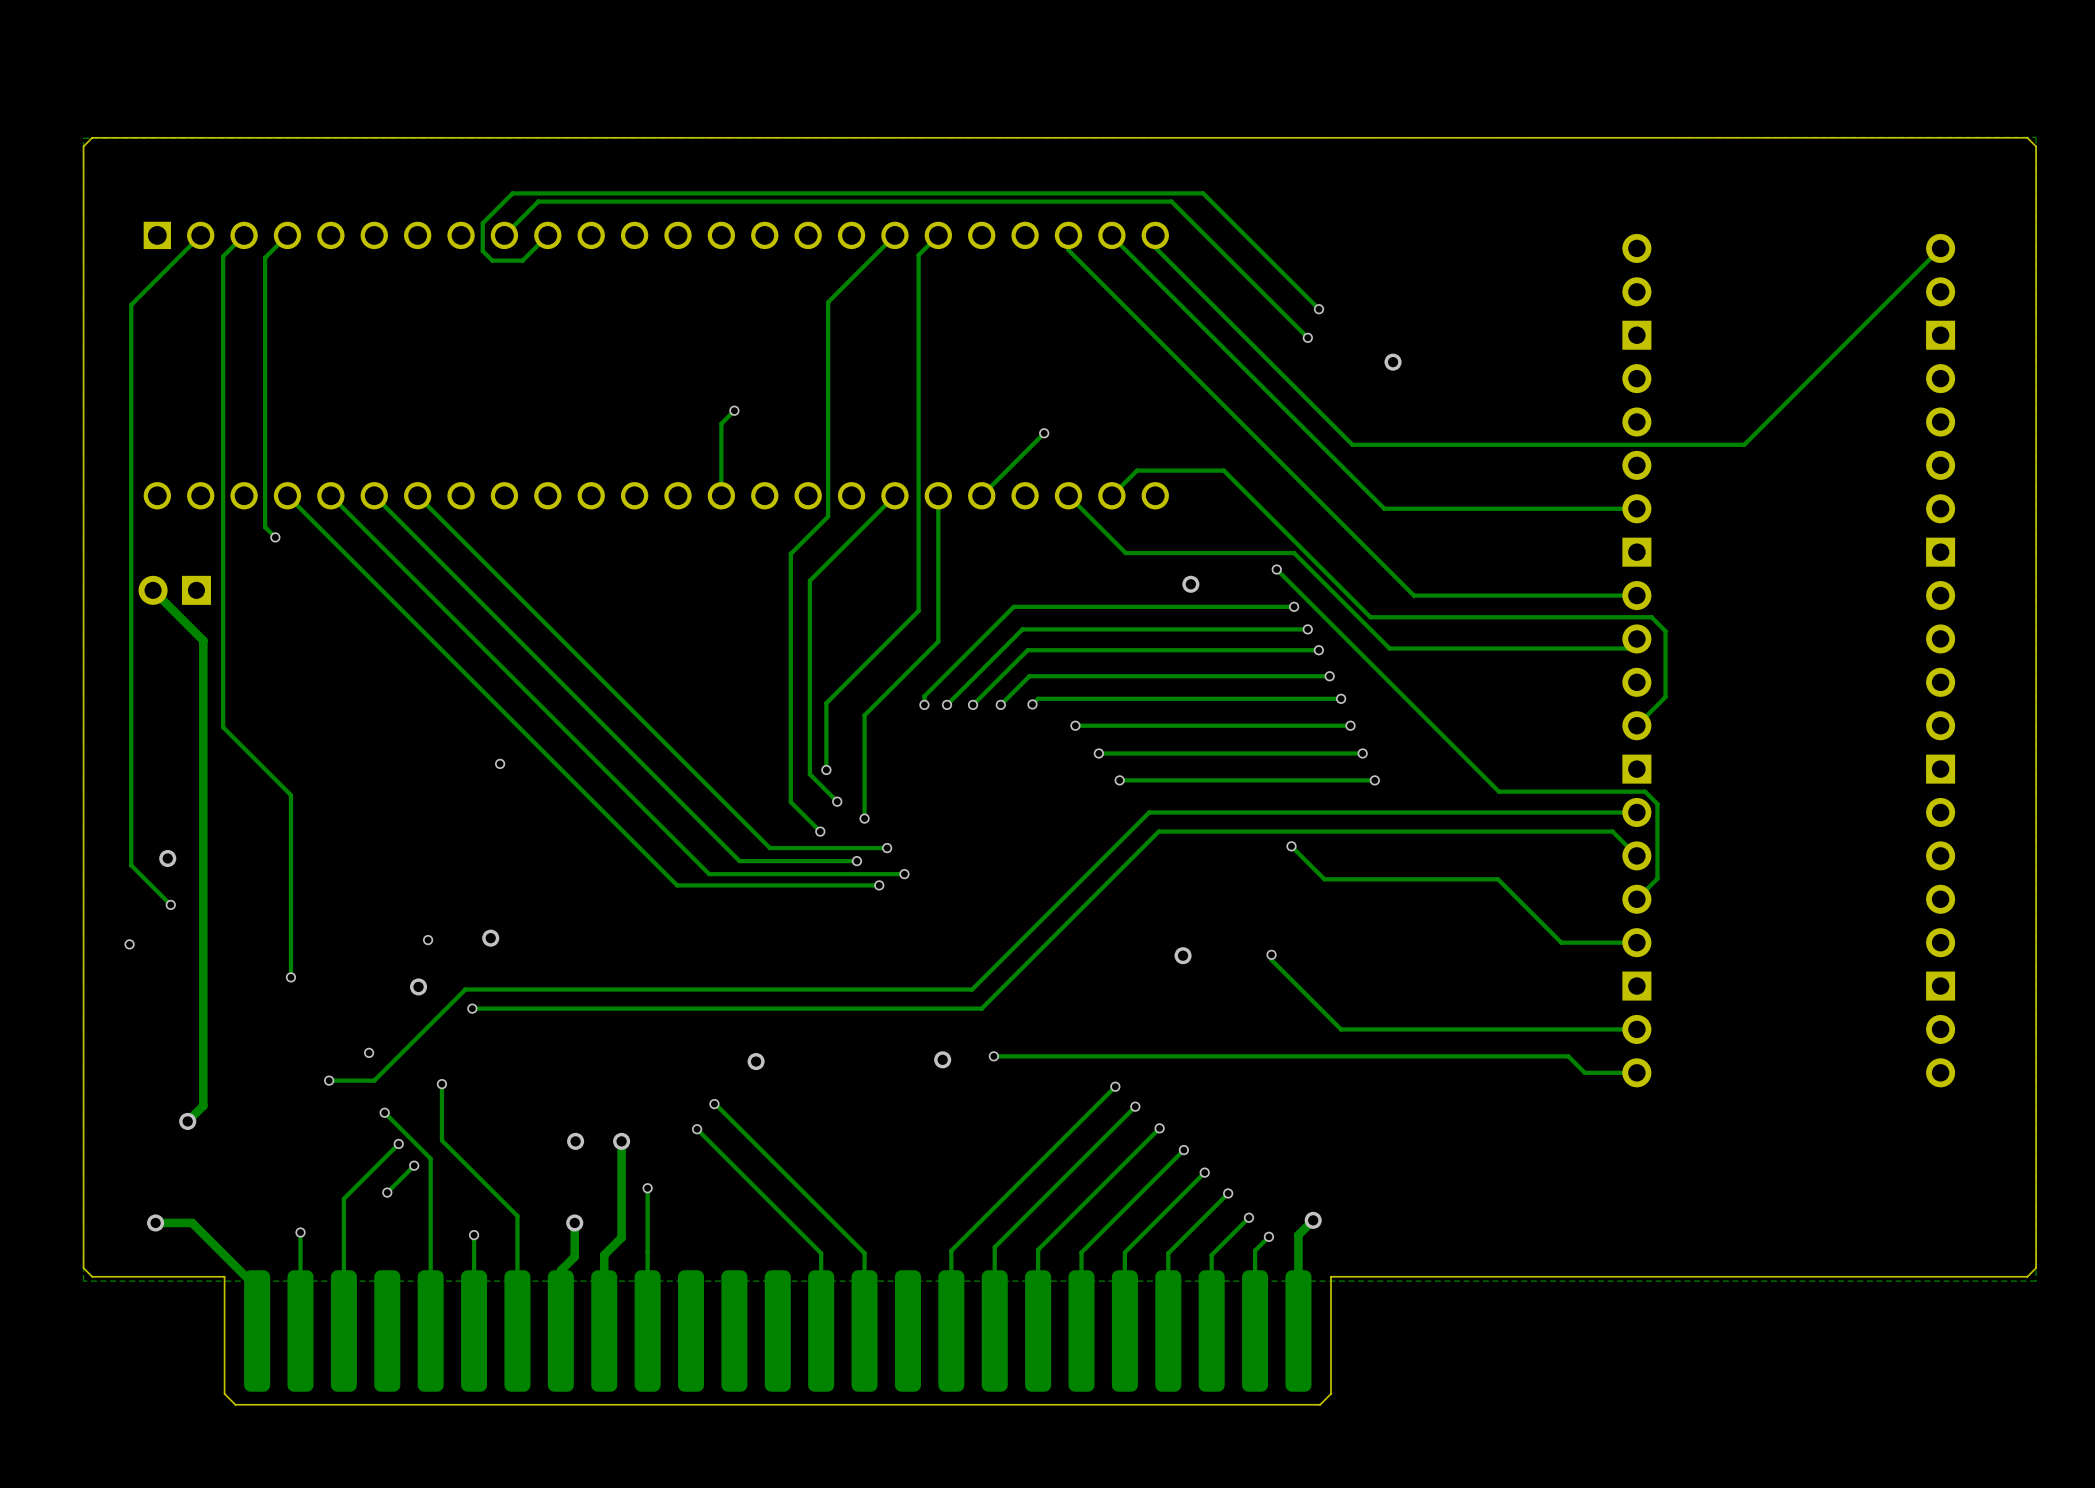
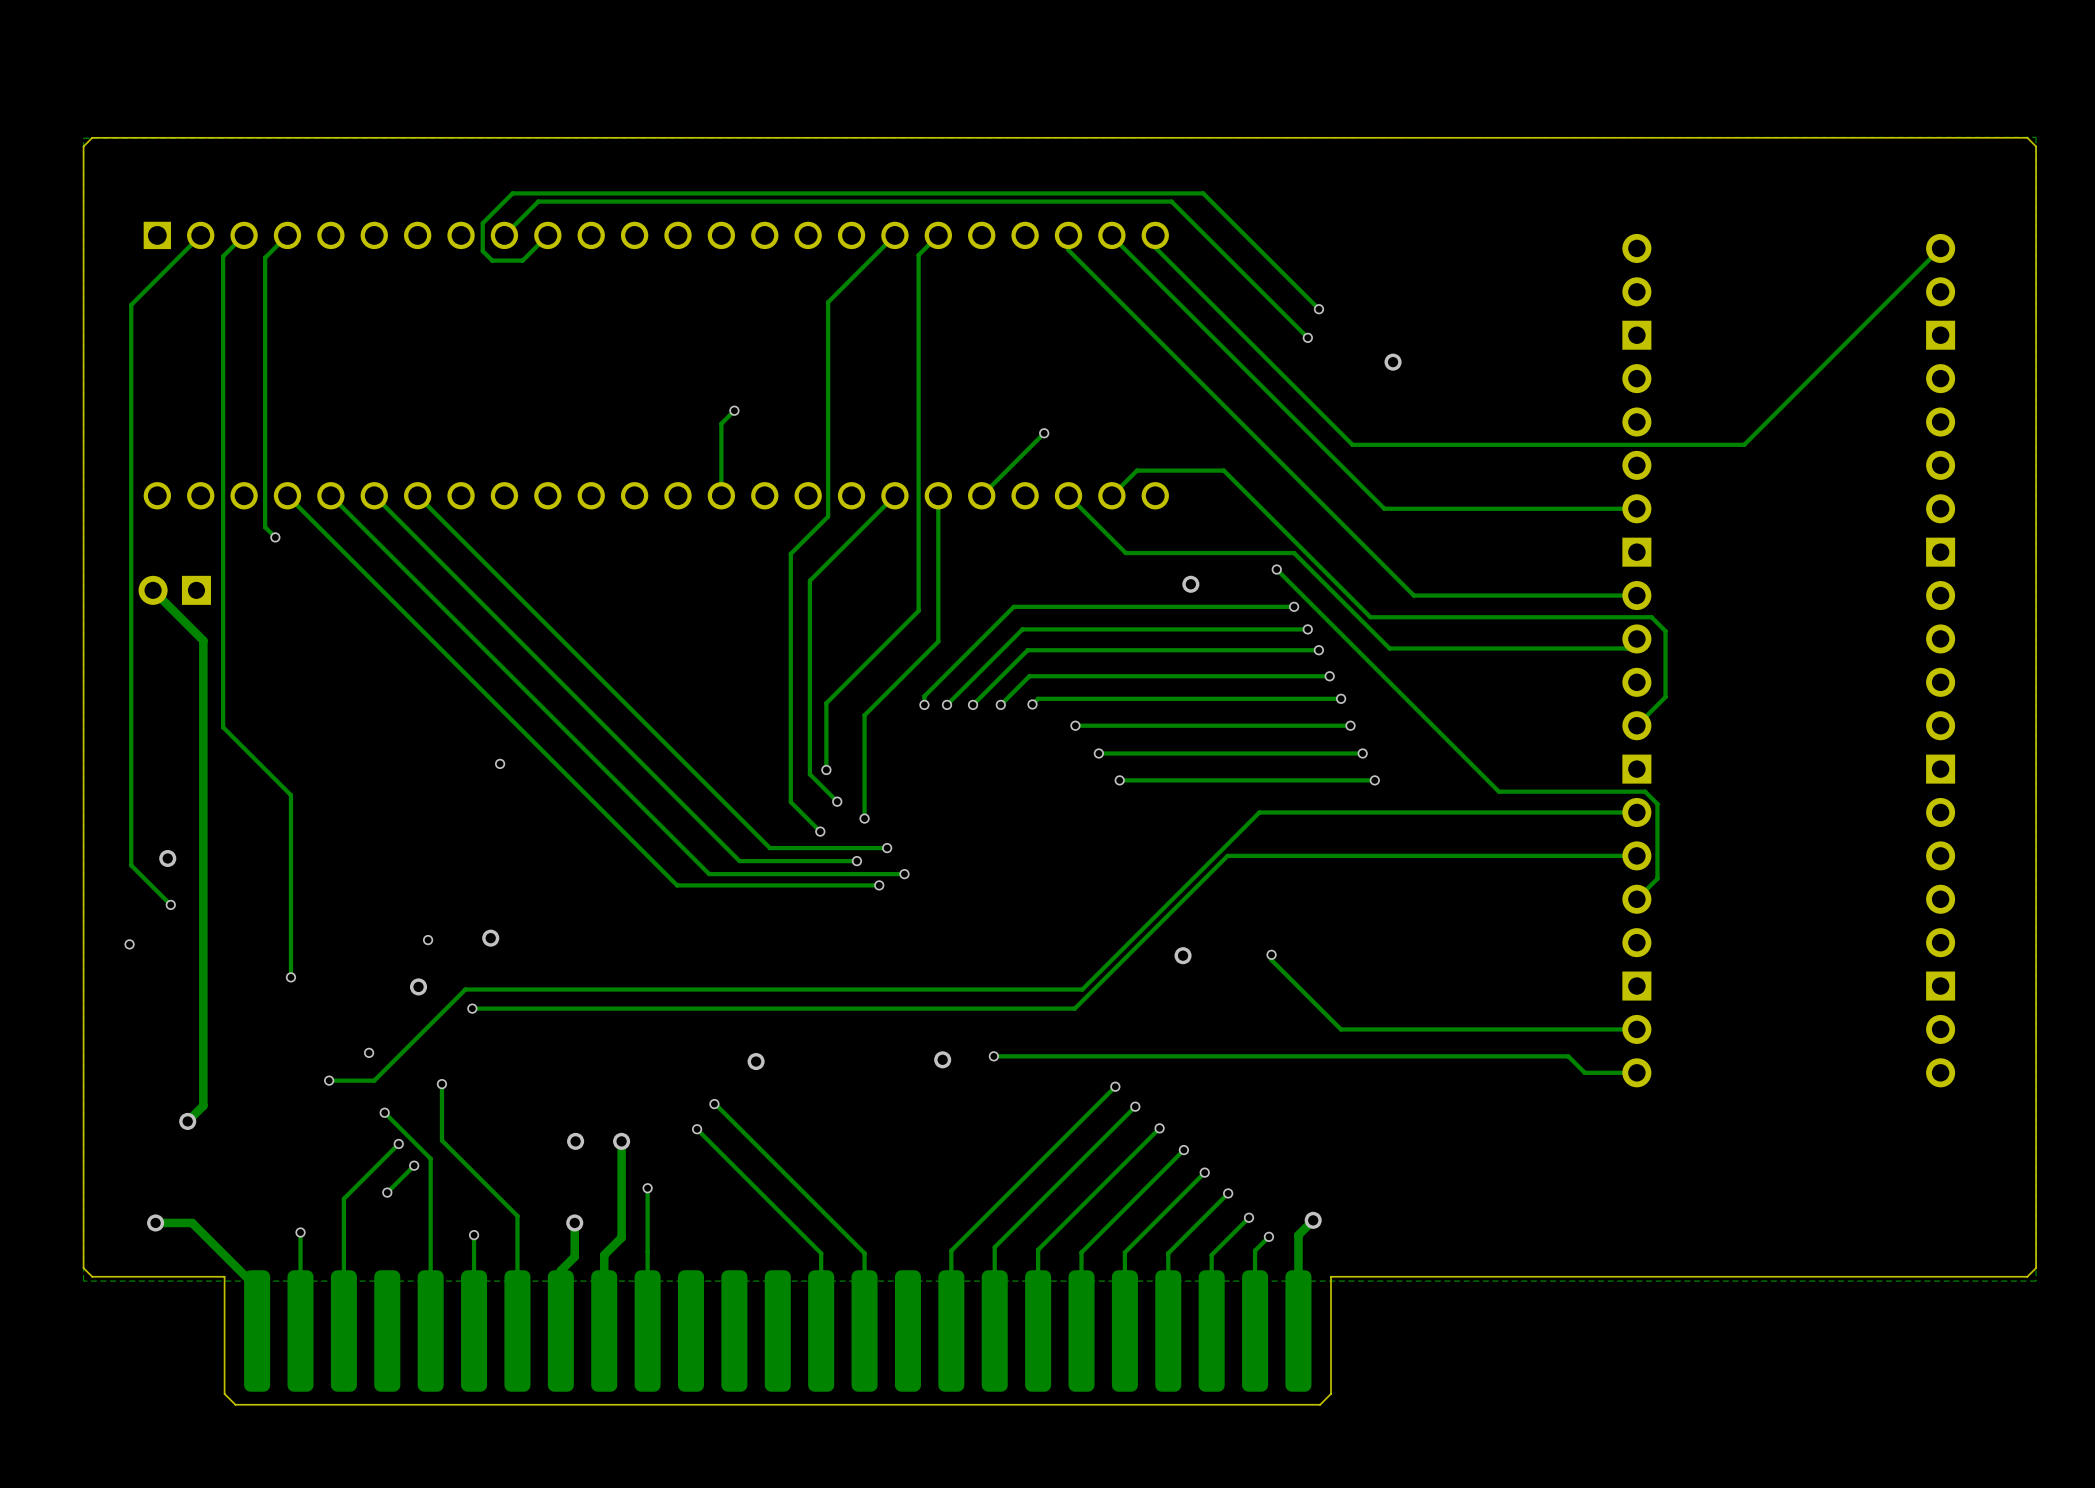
track: (1259, 812) (1149, 812) (972, 989) -> (1259, 812) (1082, 989) (972, 989)
track: (1291, 846) (1324, 879) (1498, 879) (1561, 942) (1636, 942) -> none
via: (1291, 846) -> none
track: (1636, 855) (1612, 831) (1158, 831) (981, 1008) -> (1636, 855) (1227, 855) (1074, 1008) (981, 1008)

